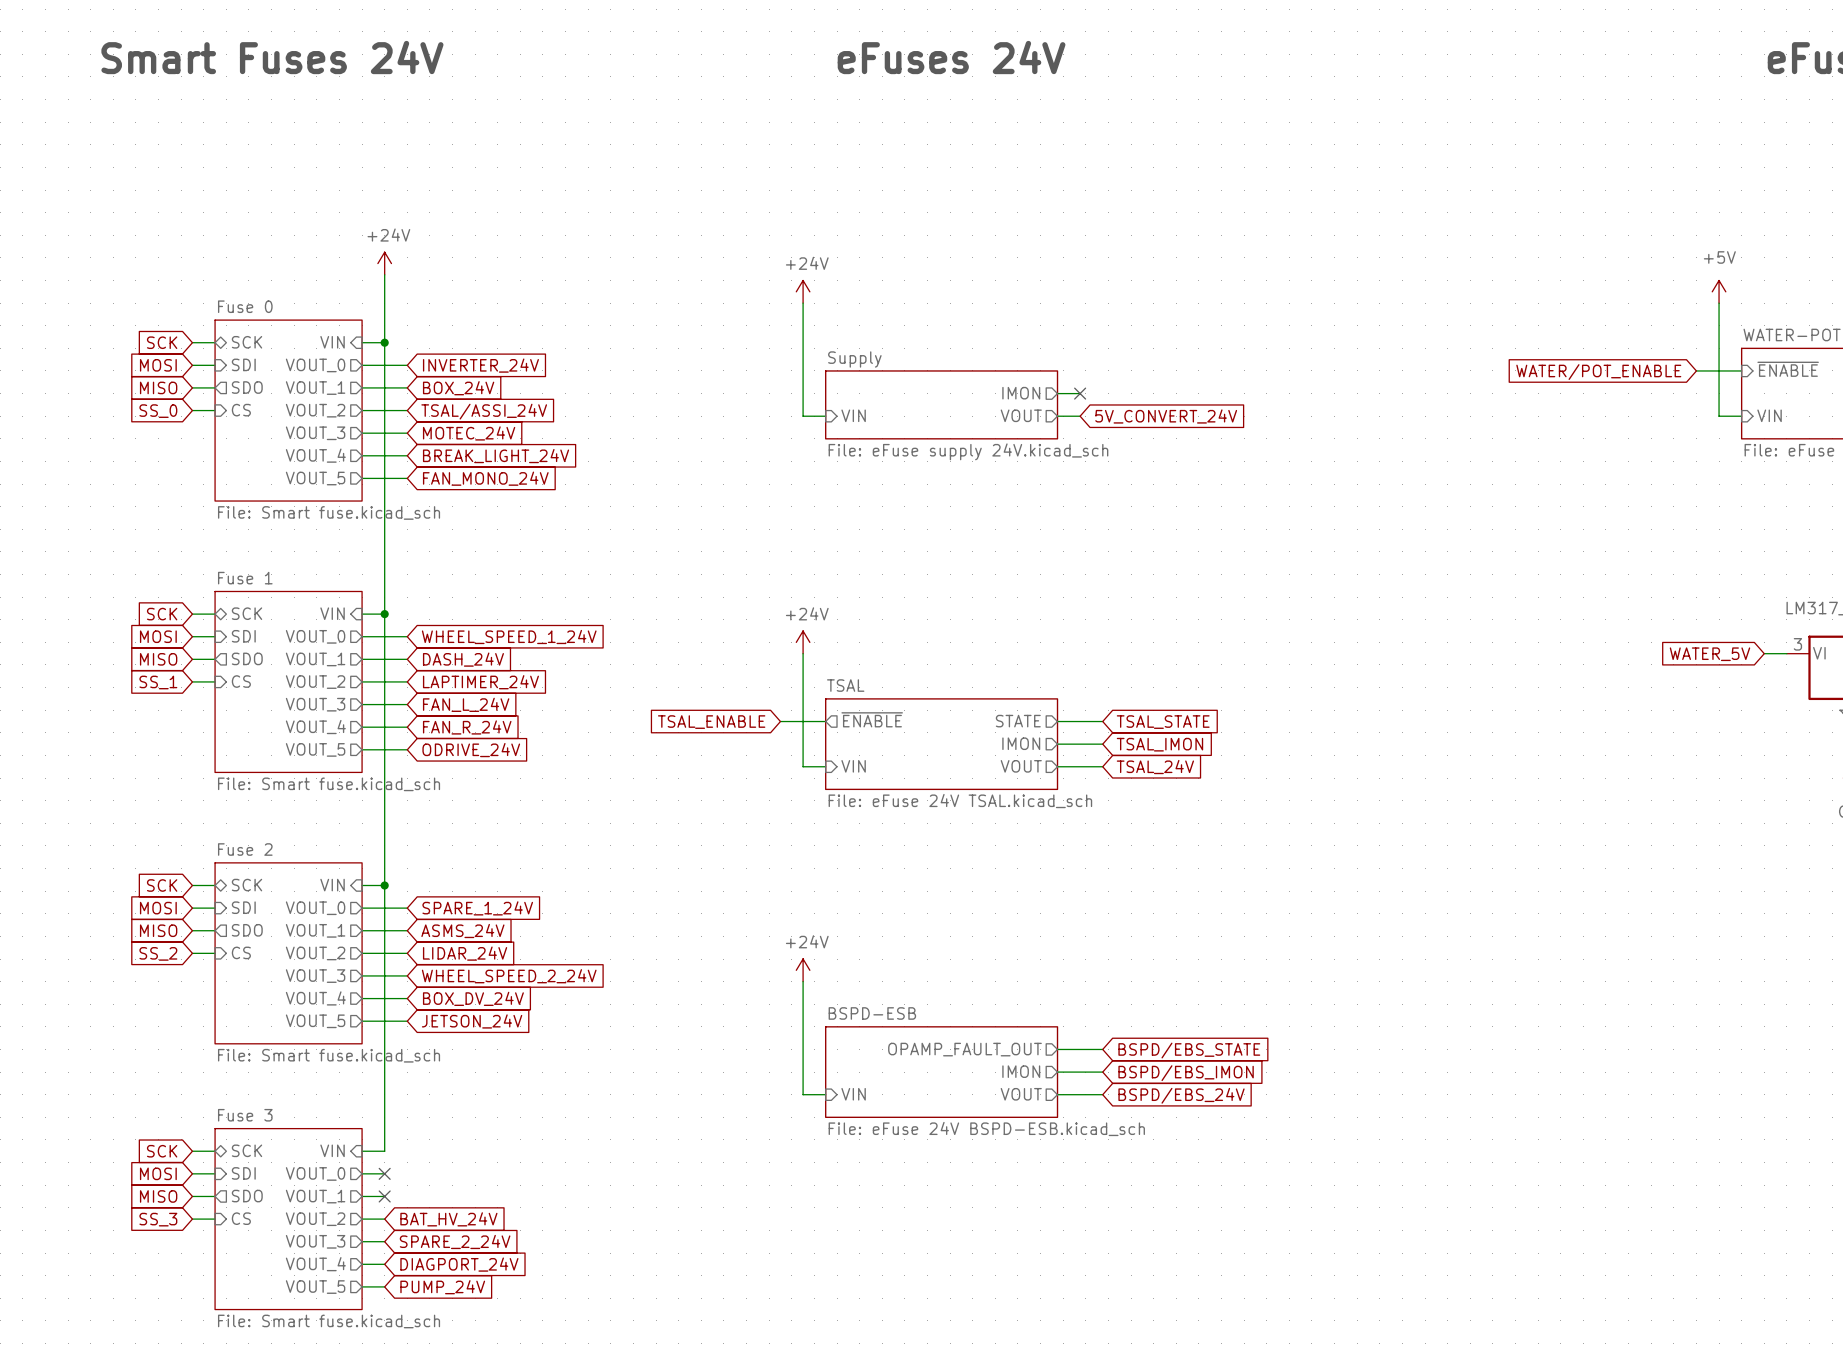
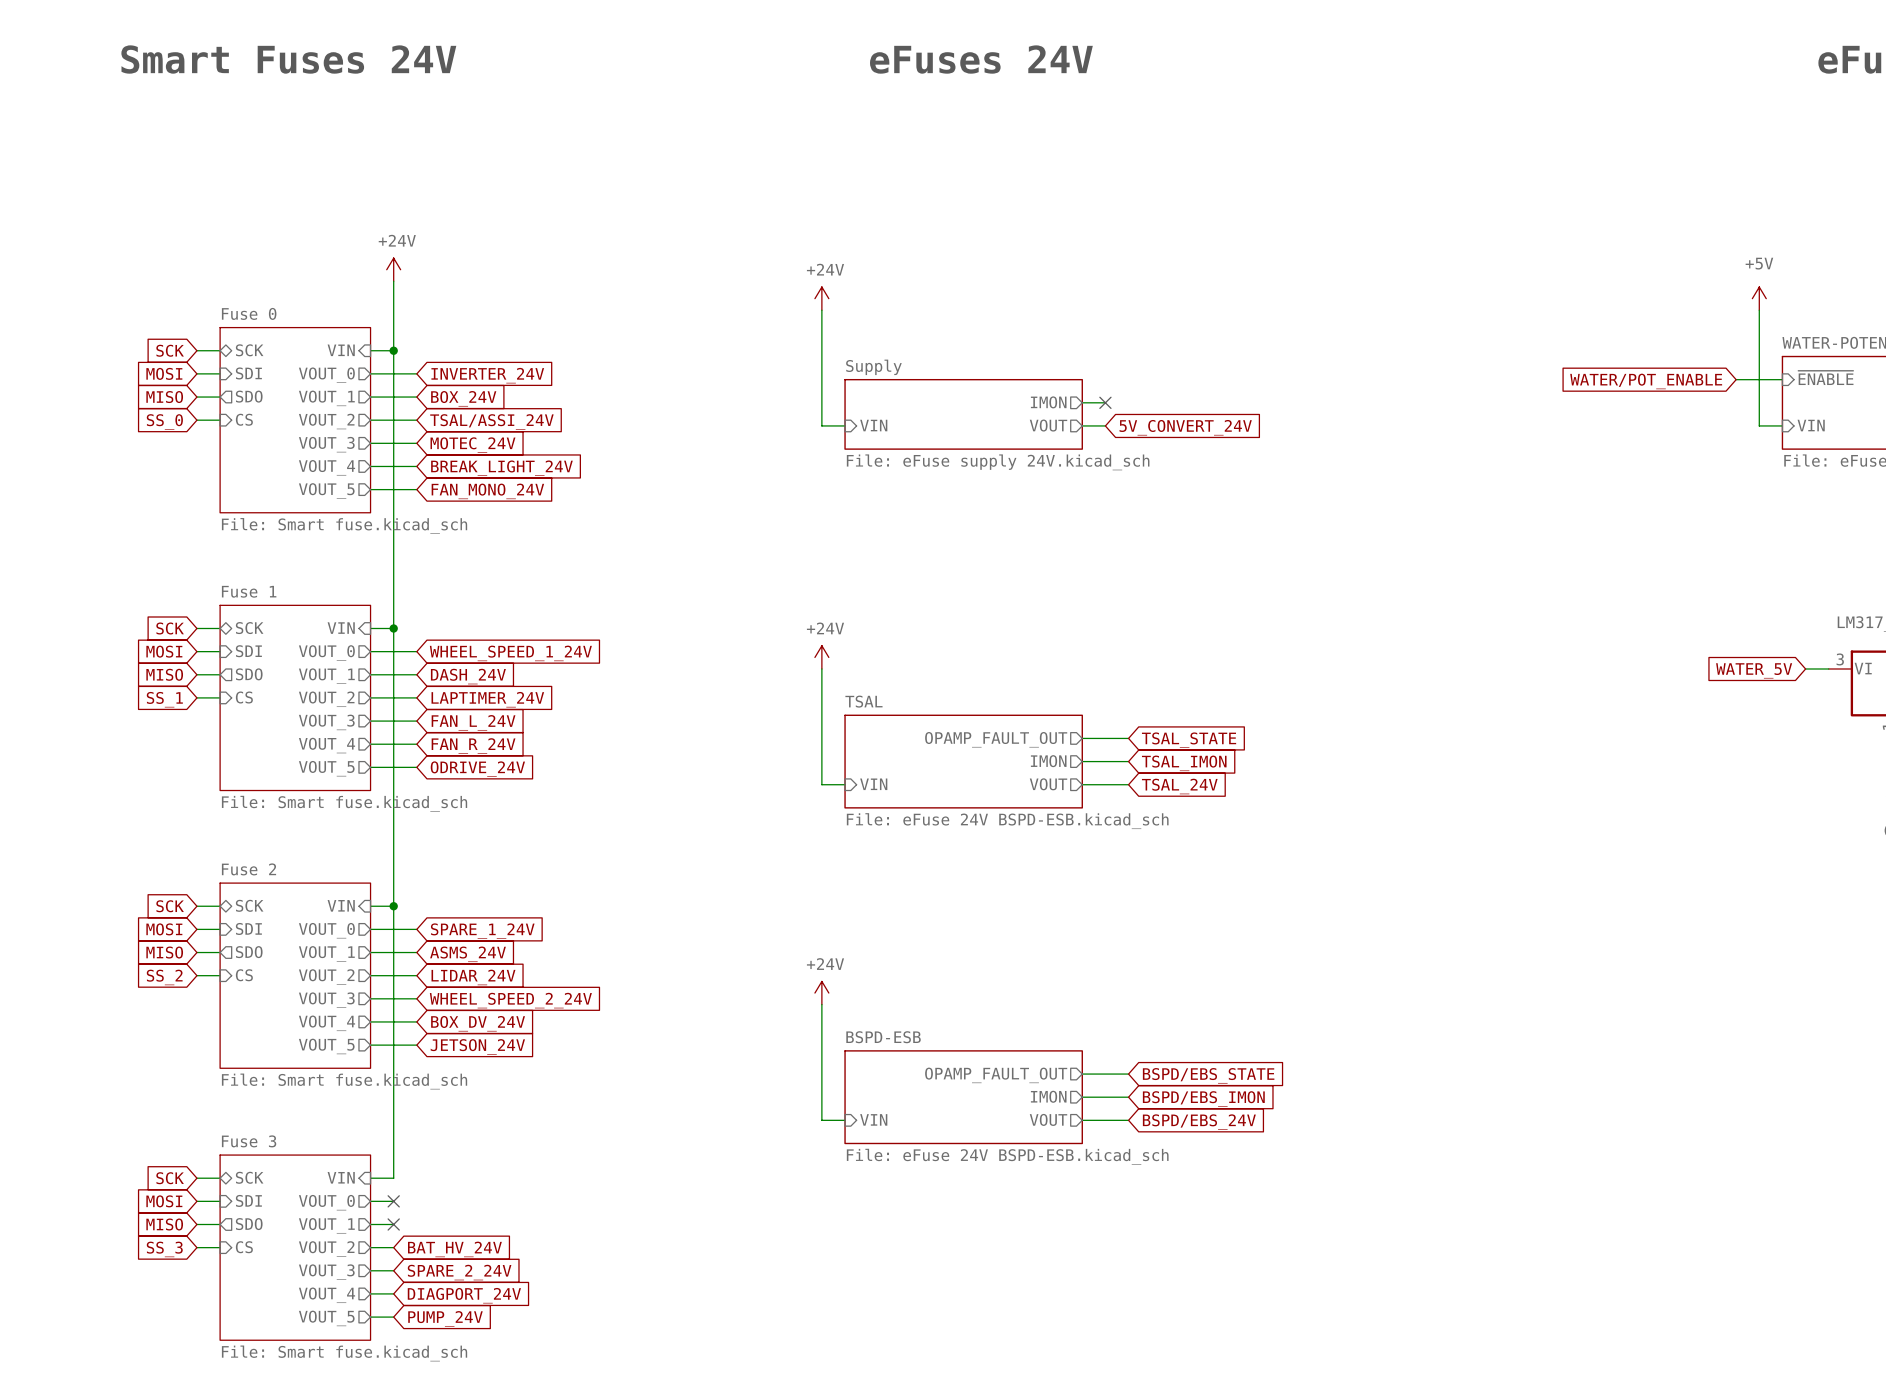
sheet pin: ~{ENABLE} (872, 719) -> none
wire: (780, 721) (825, 721) -> none
sheet pin: STATE (1018, 721) -> OPAMP_FAULT_OUT (996, 739)
global label: TSAL_ENABLE (711, 722) -> none
sheet TSAL value: File: eFuse 24V TSAL.kicad_sch (960, 801) -> File: eFuse 24V BSPD-ESB.kicad_sch (1007, 821)

